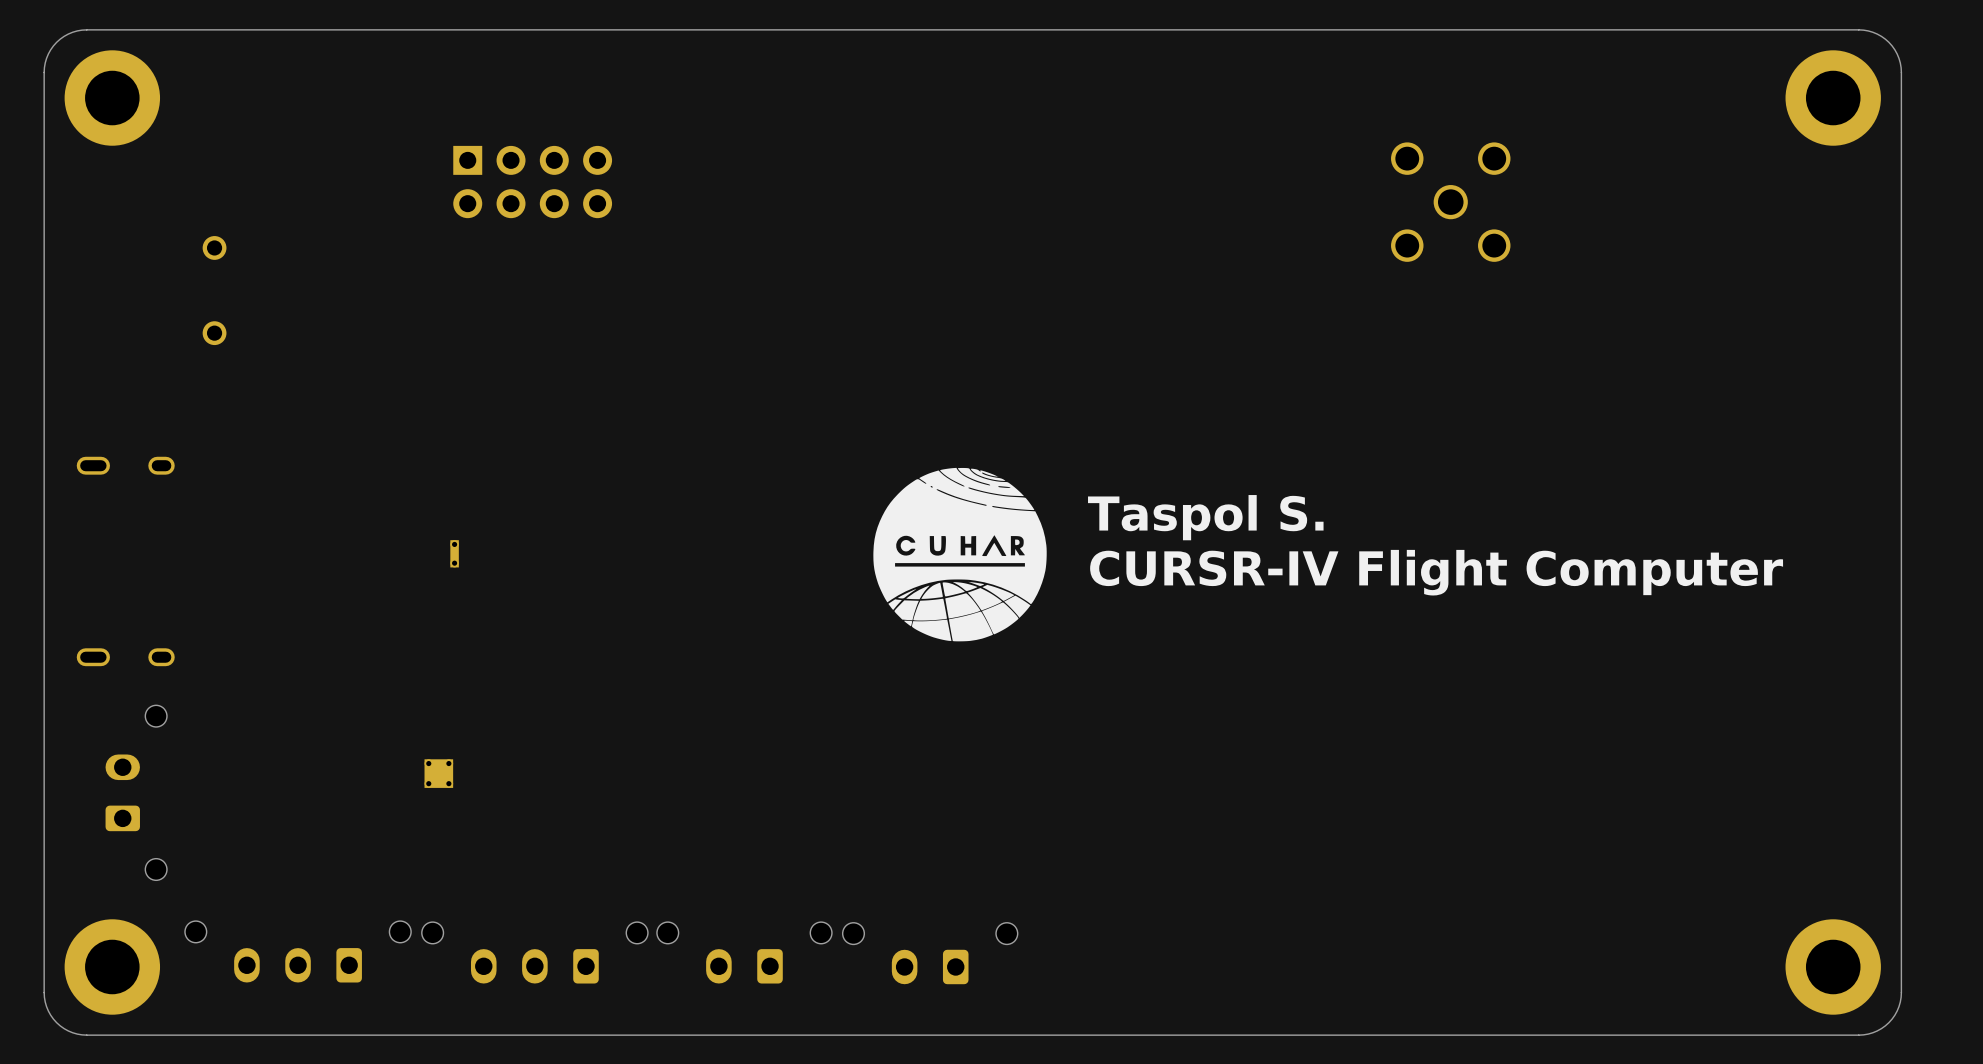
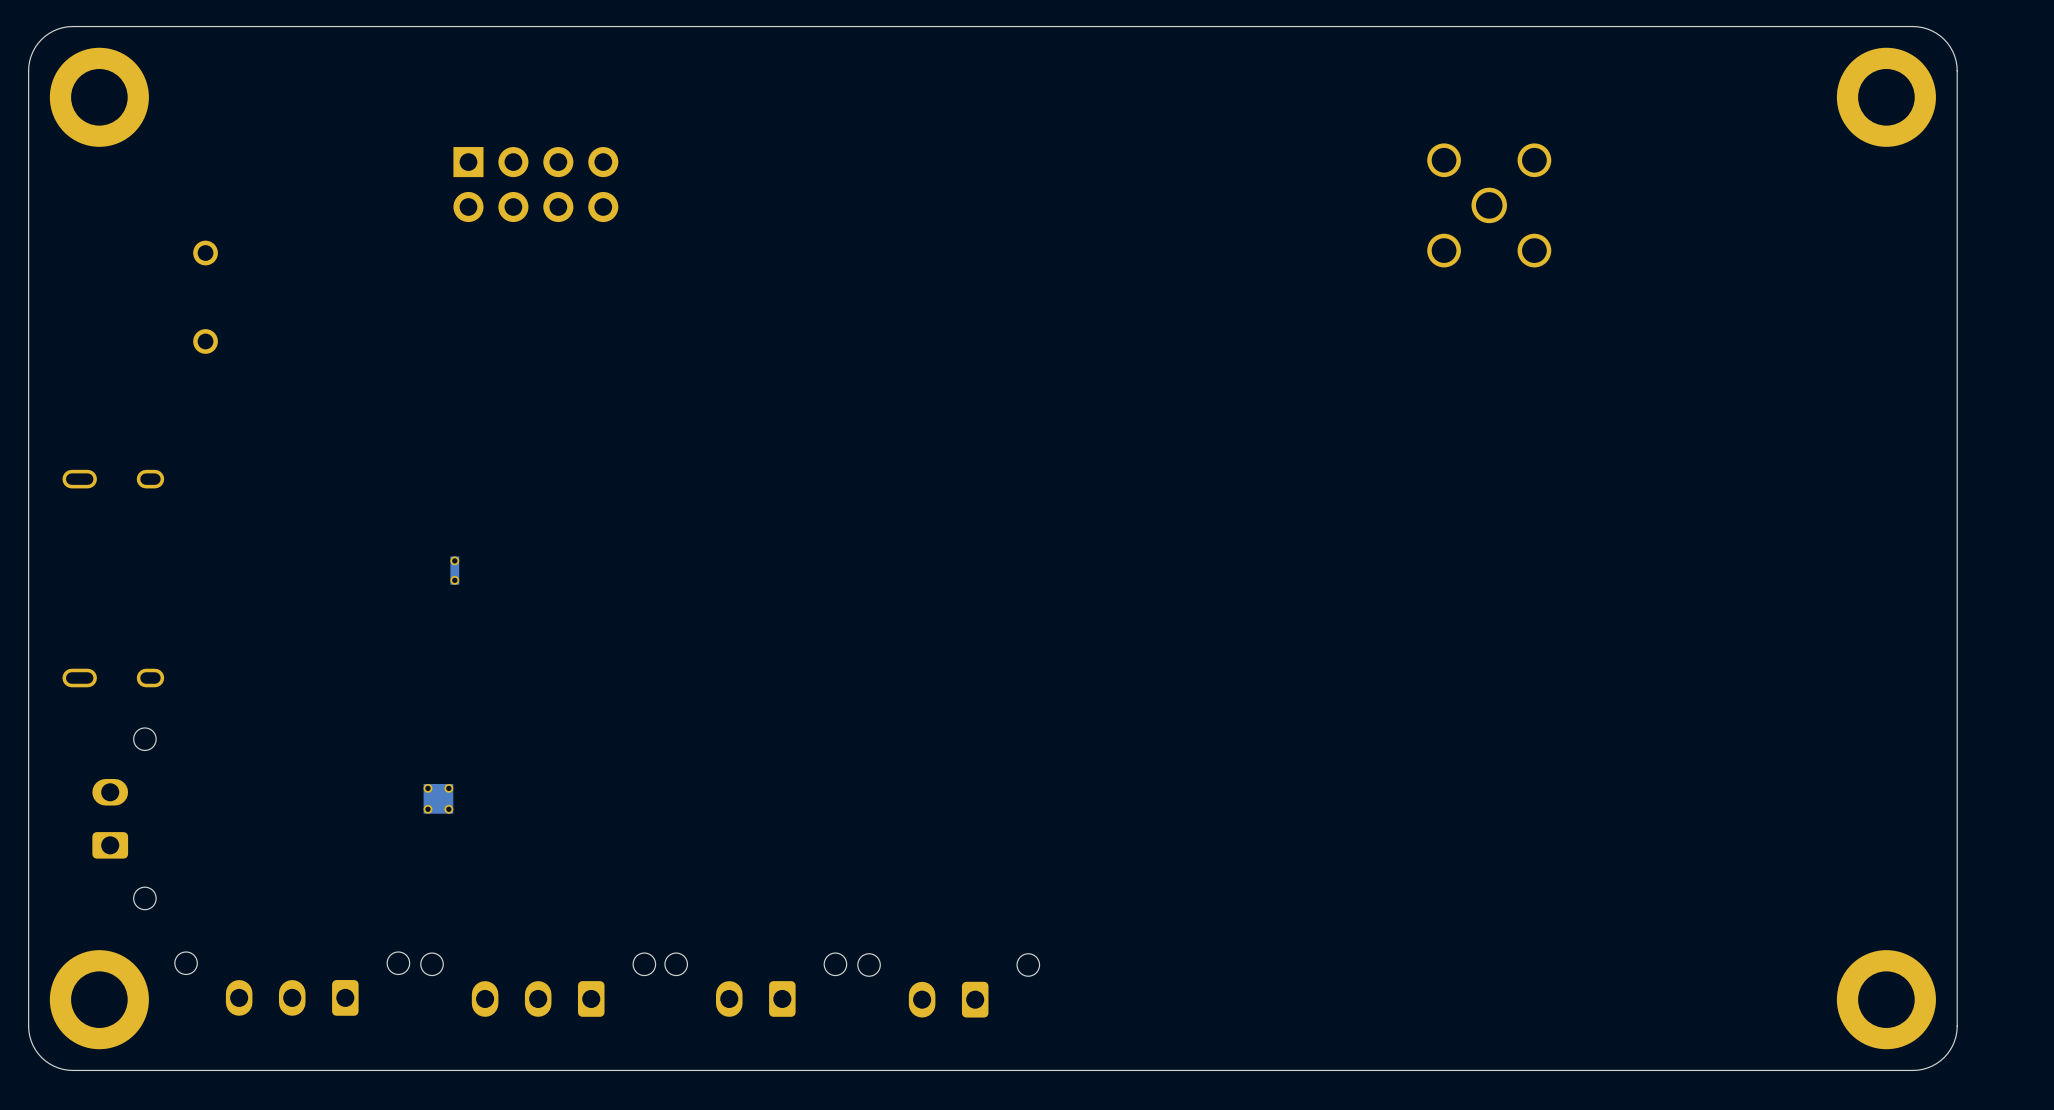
drawing: [873, 467, 1047, 642] -> none
text: Taspol S. (1205, 517) -> none
text: CURSR-IV Flight Computer (1436, 572) -> none

